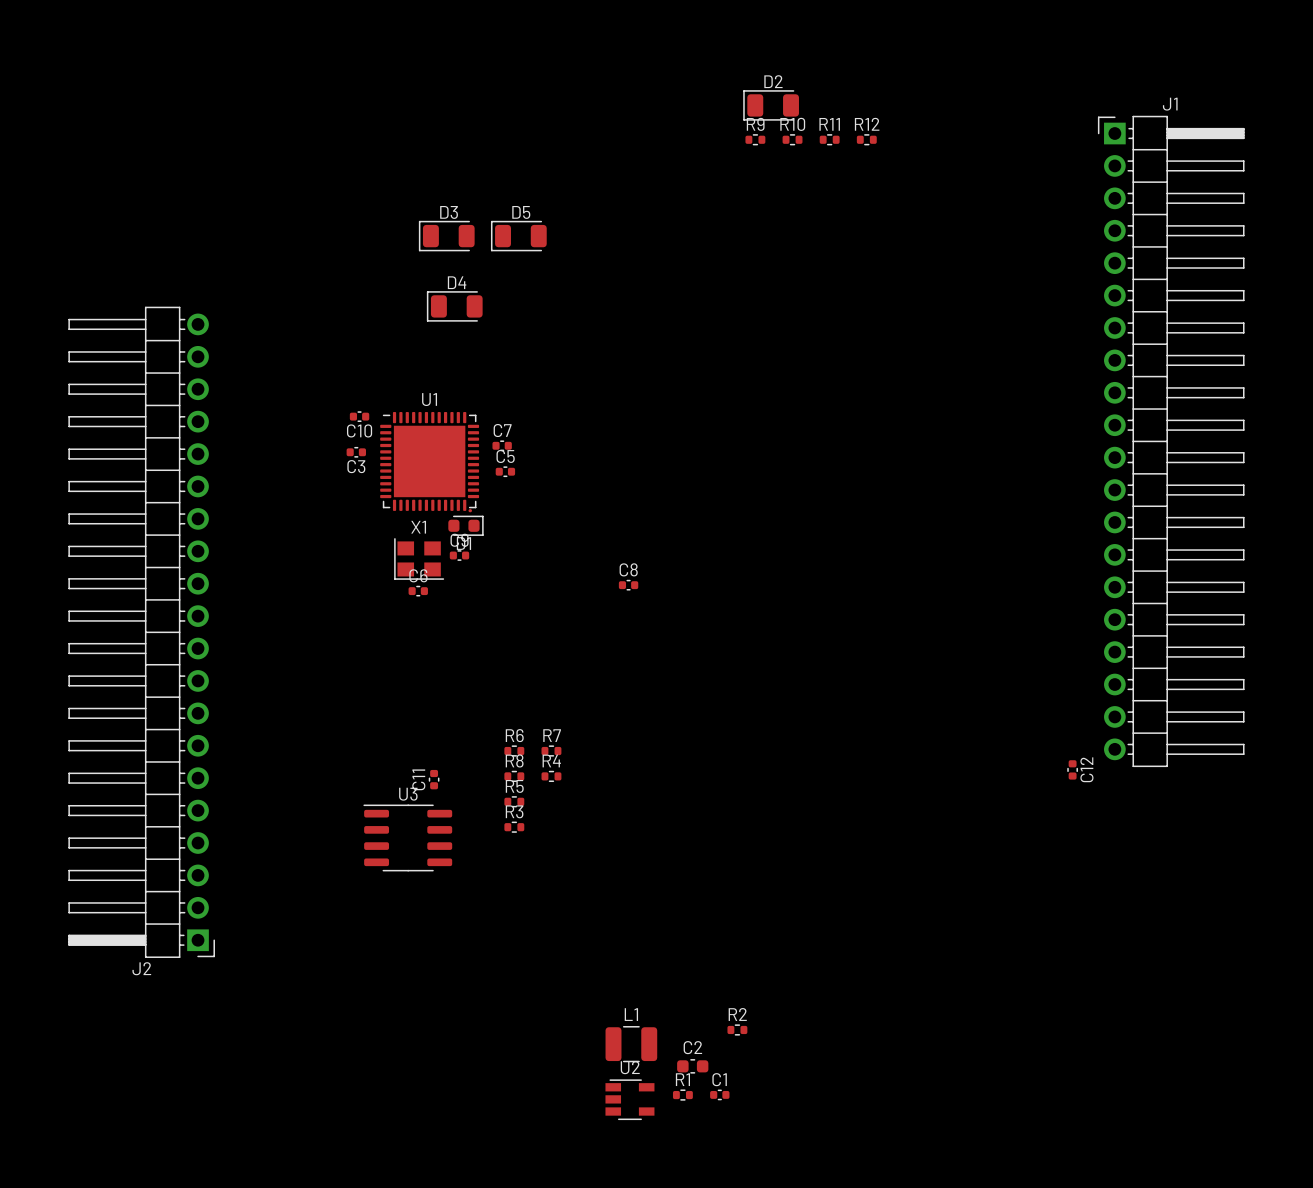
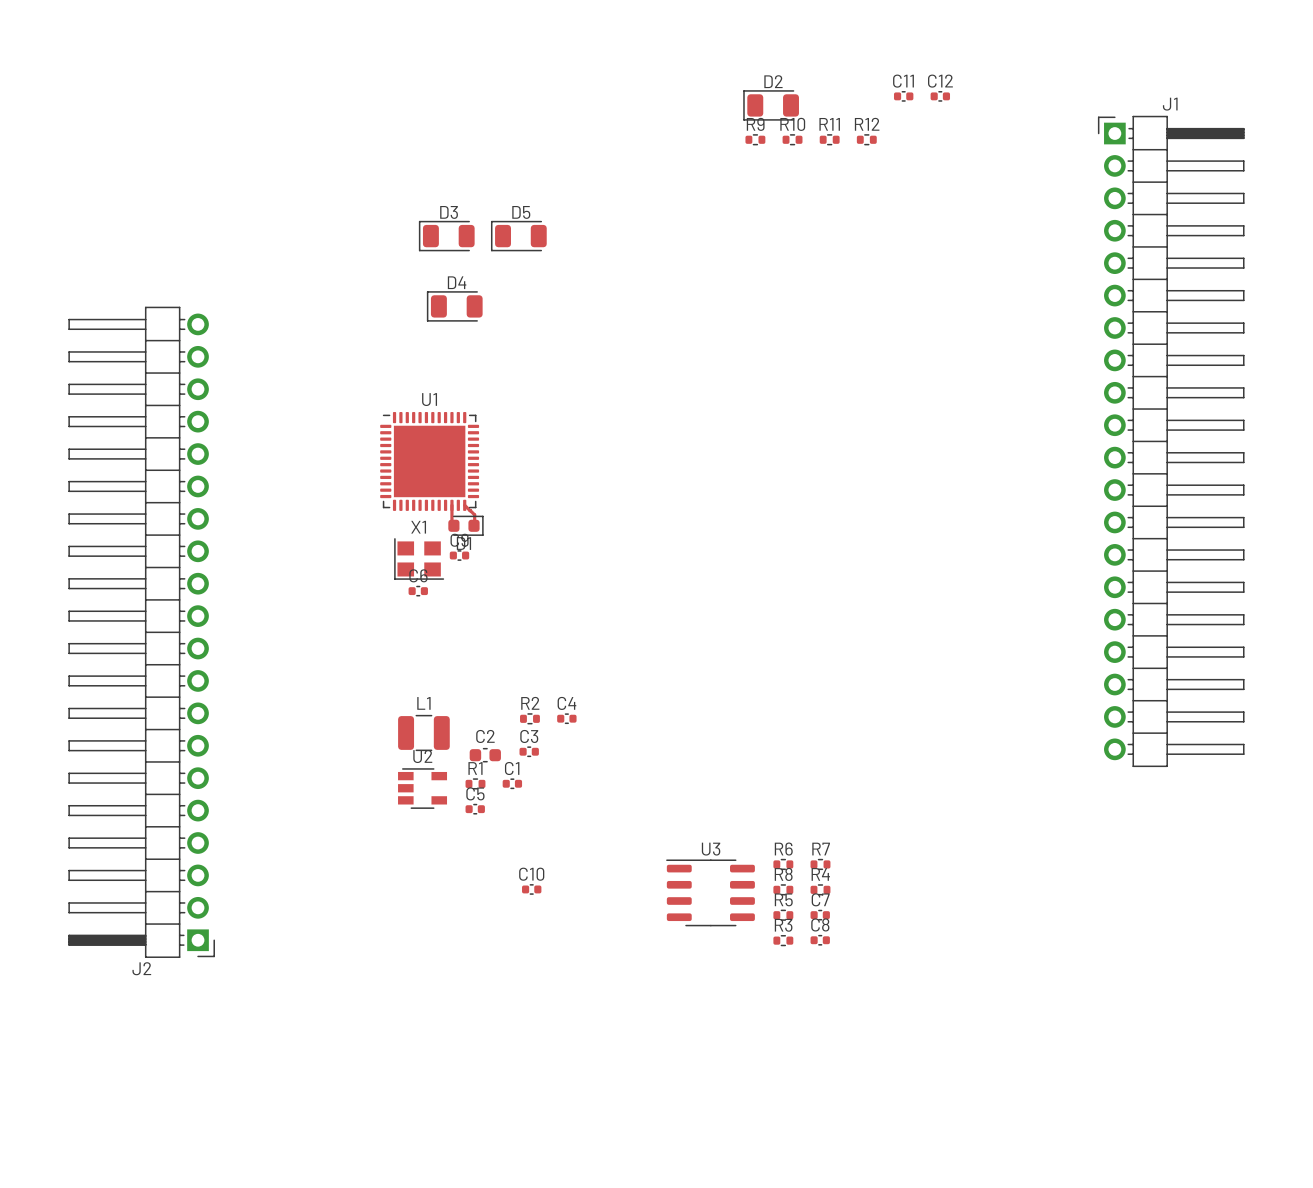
C10 position: (359, 416) -> (531, 889)
C10 name position: C10 (359, 430) -> C10 (531, 874)
C7 position: (502, 445) -> (820, 915)
C3 position: (356, 452) -> (529, 751)
C3 name position: C3 (356, 466) -> C3 (529, 736)
C5 position: (505, 471) -> (475, 809)
track: none -> (451, 505) (451, 524)
track: none -> (464, 505) (470, 510)
track: none -> (470, 510) (474, 514) (474, 527)
C8 position: (628, 585) -> (820, 940)
C4: none -> (566, 718)
R6 position: (514, 751) -> (783, 864)
R7 position: (551, 751) -> (820, 864)
C12 rotation: 0° (1072, 769) -> 90° clockwise (940, 96)
C12 position: (1072, 769) -> (940, 96)
R8 position: (514, 776) -> (783, 889)
R4 position: (551, 776) -> (820, 889)
C11 rotation: 0° (434, 779) -> 90° clockwise (903, 96)
C11 position: (434, 779) -> (903, 96)
R5 position: (514, 801) -> (783, 915)
R3 position: (514, 827) -> (783, 940)
U3 position: (407, 837) -> (710, 892)
R2 position: (737, 1029) -> (529, 718)
L1 position: (631, 1044) -> (423, 732)
C2 position: (692, 1066) -> (485, 755)
C1 position: (719, 1094) -> (512, 783)
R1 position: (682, 1095) -> (475, 783)
U2 position: (629, 1099) -> (422, 788)

